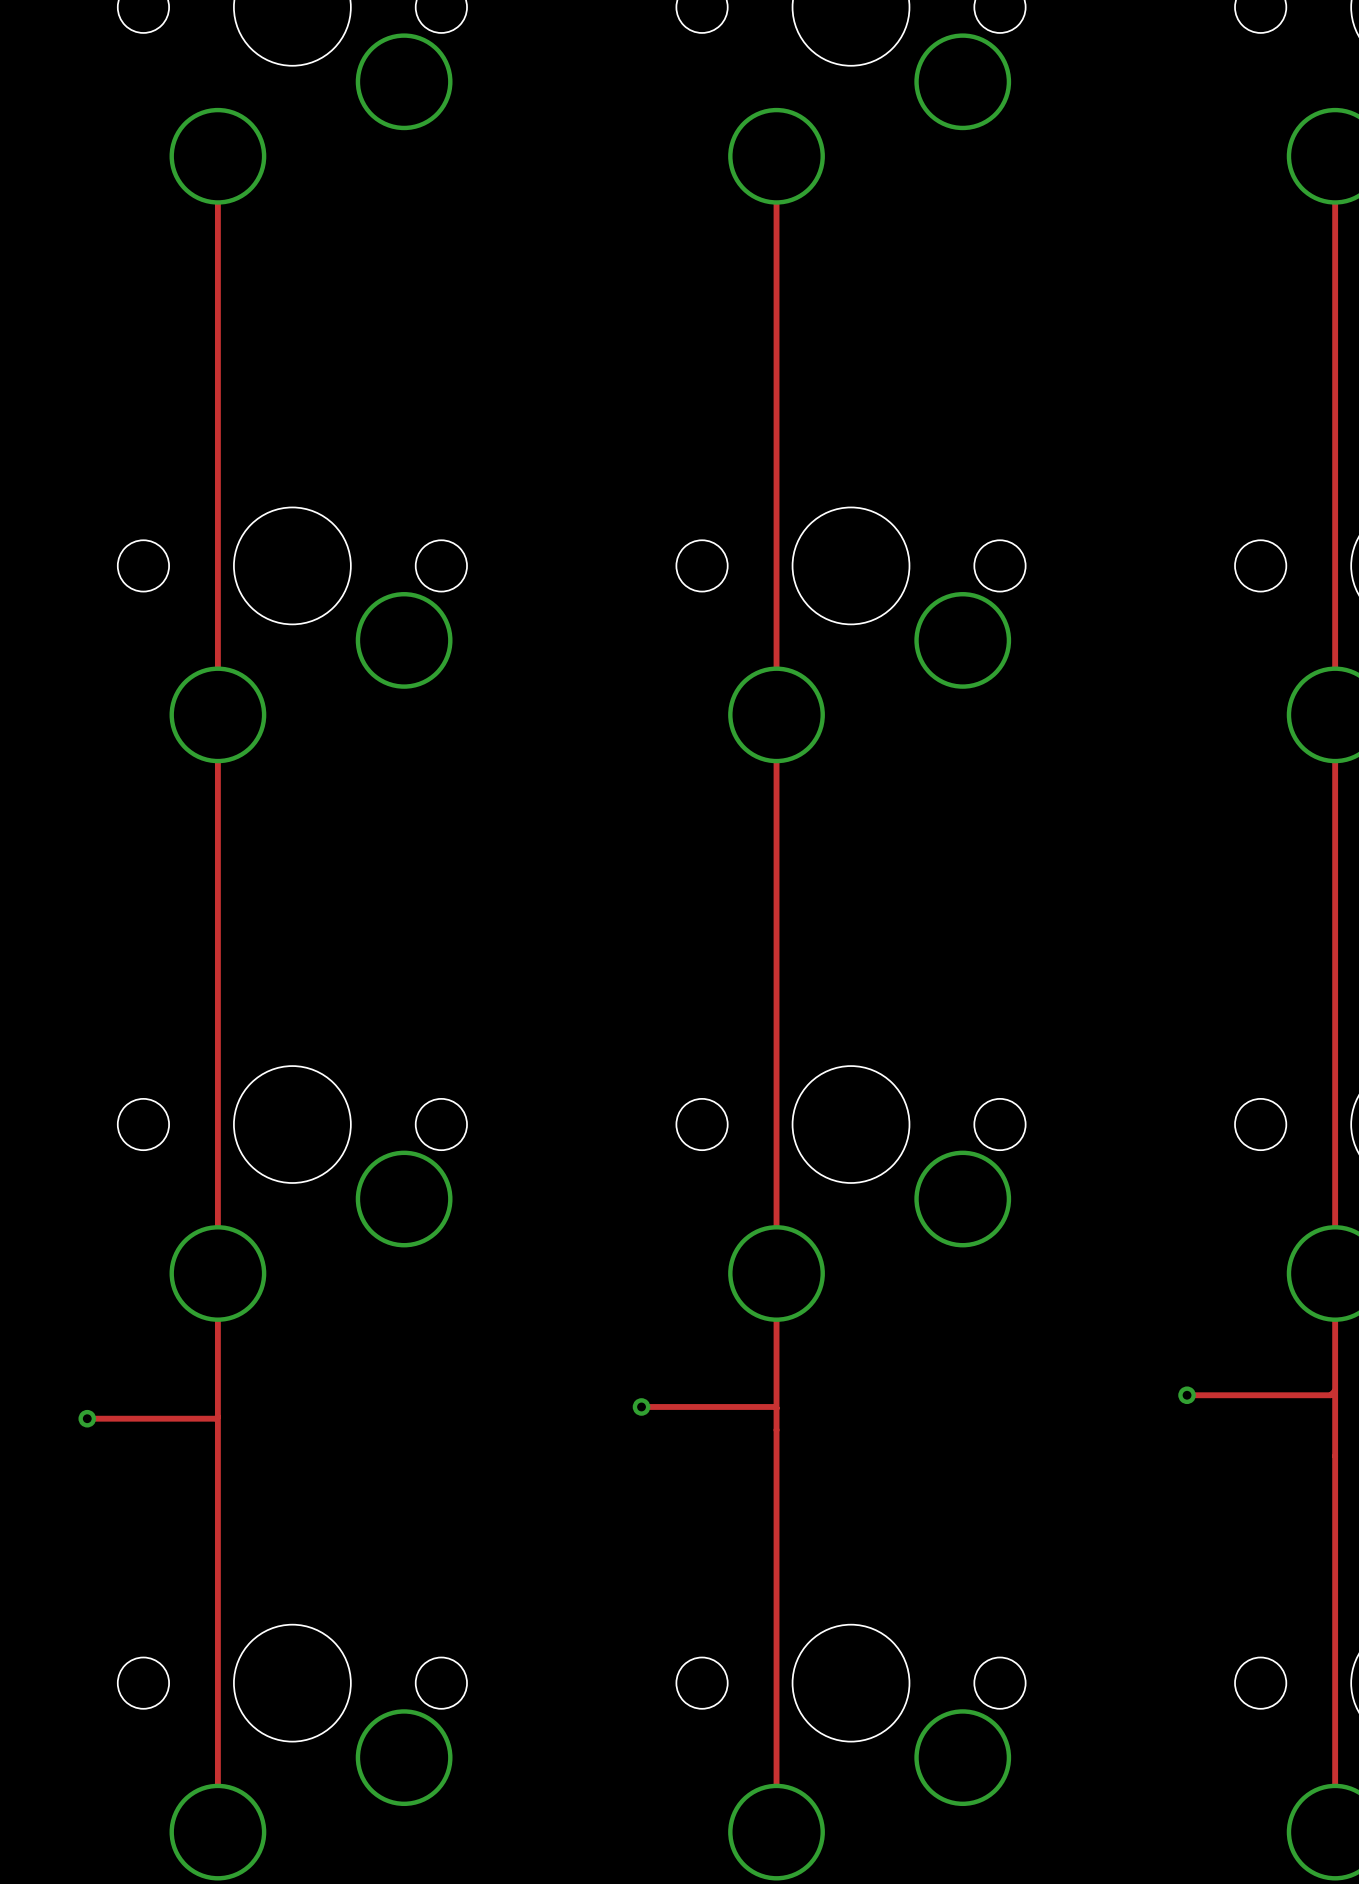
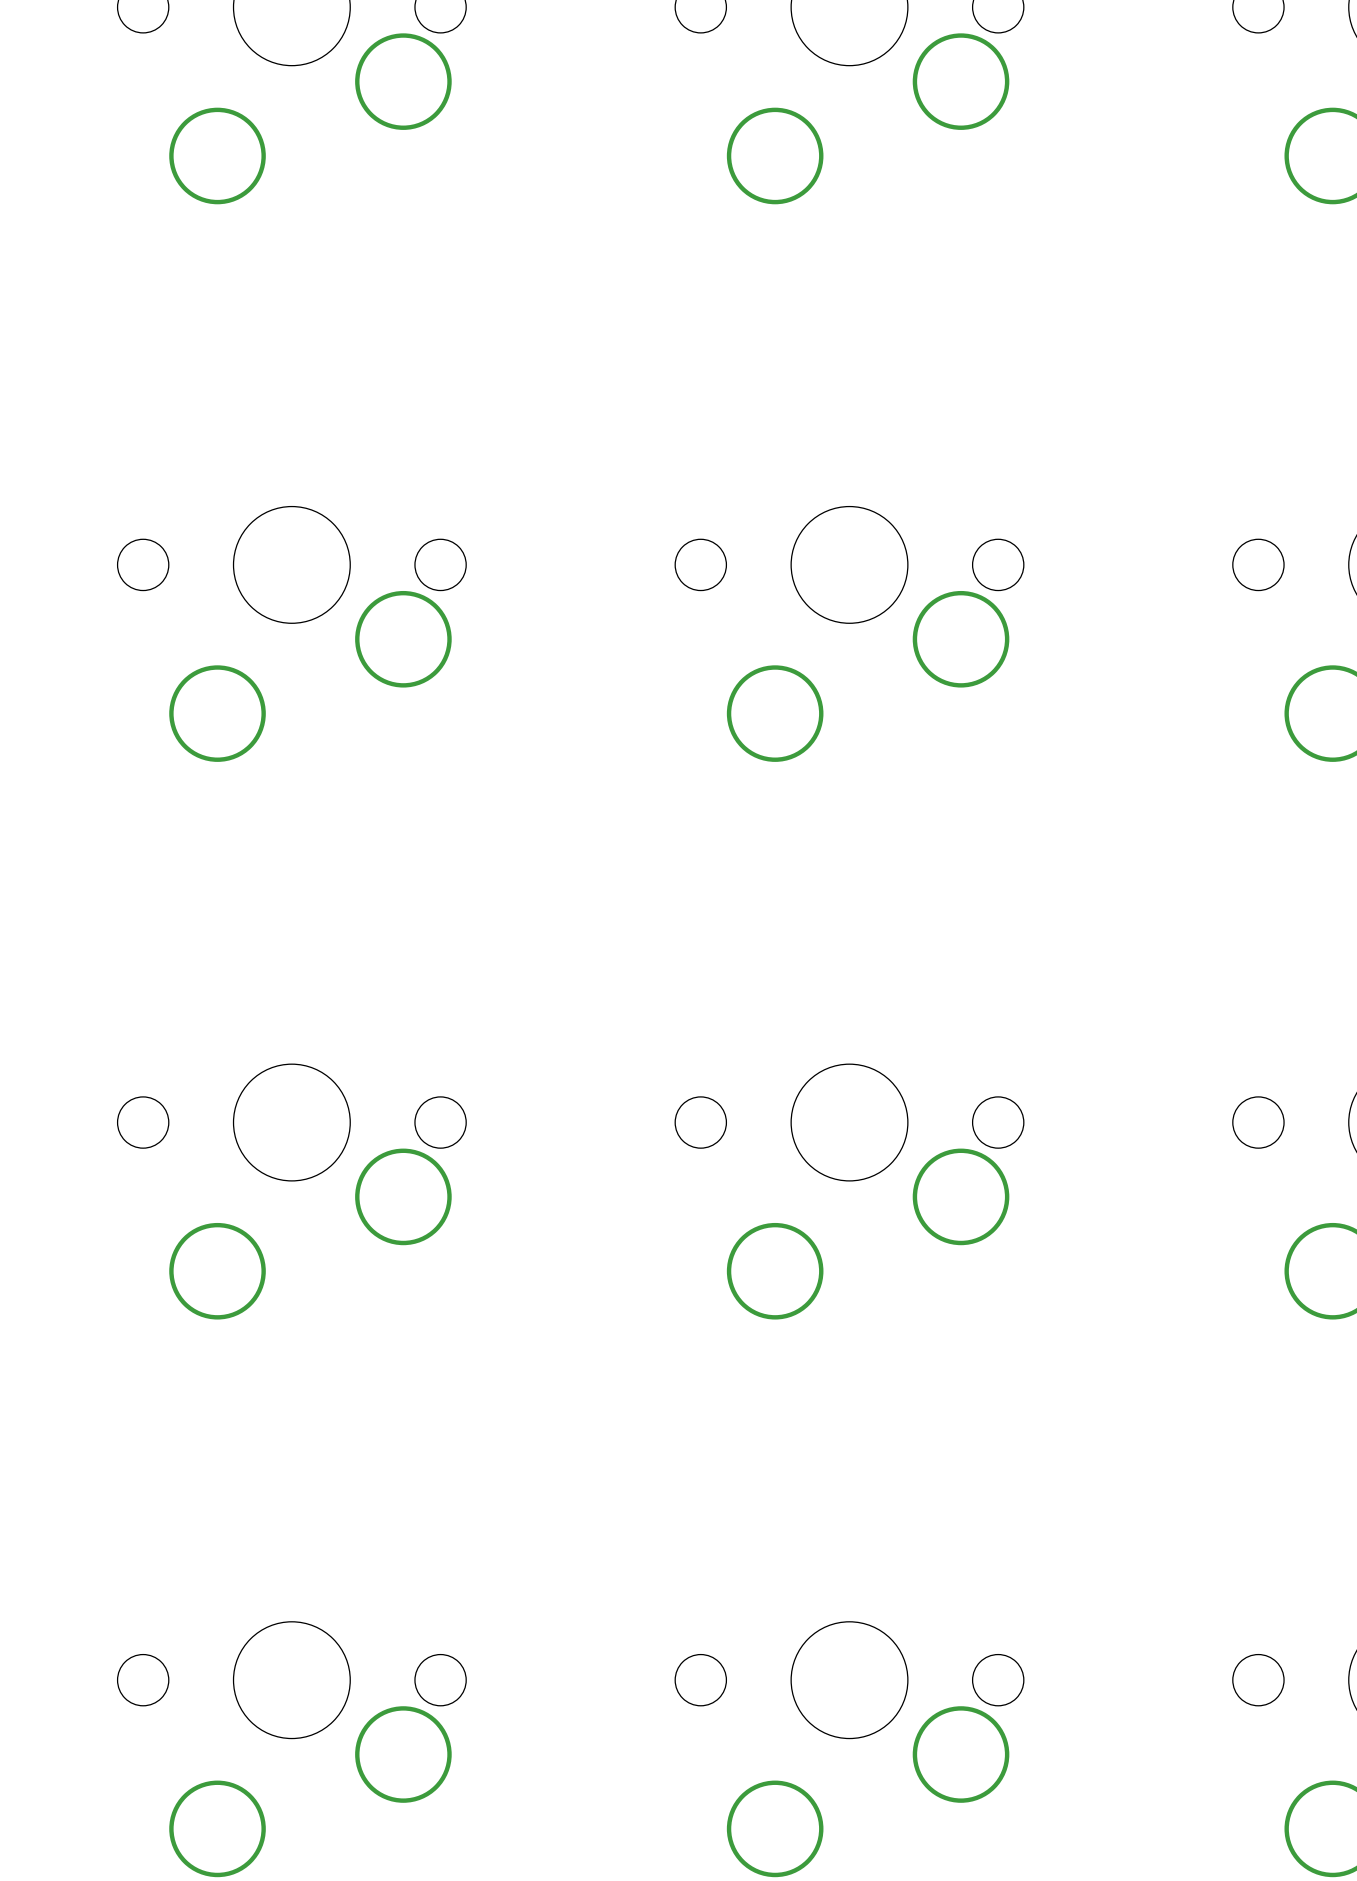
track: (217, 156) (217, 1832) -> none
track: (776, 156) (776, 1832) -> none
track: (1335, 156) (1335, 1832) -> none
track: (1335, 1390) (1330, 1395) (1187, 1395) -> none
via: (1187, 1395) -> none
track: (641, 1406) (776, 1408) -> none
via: (641, 1406) -> none
track: (217, 1416) (216, 1418) (87, 1418) -> none
via: (87, 1418) -> none

